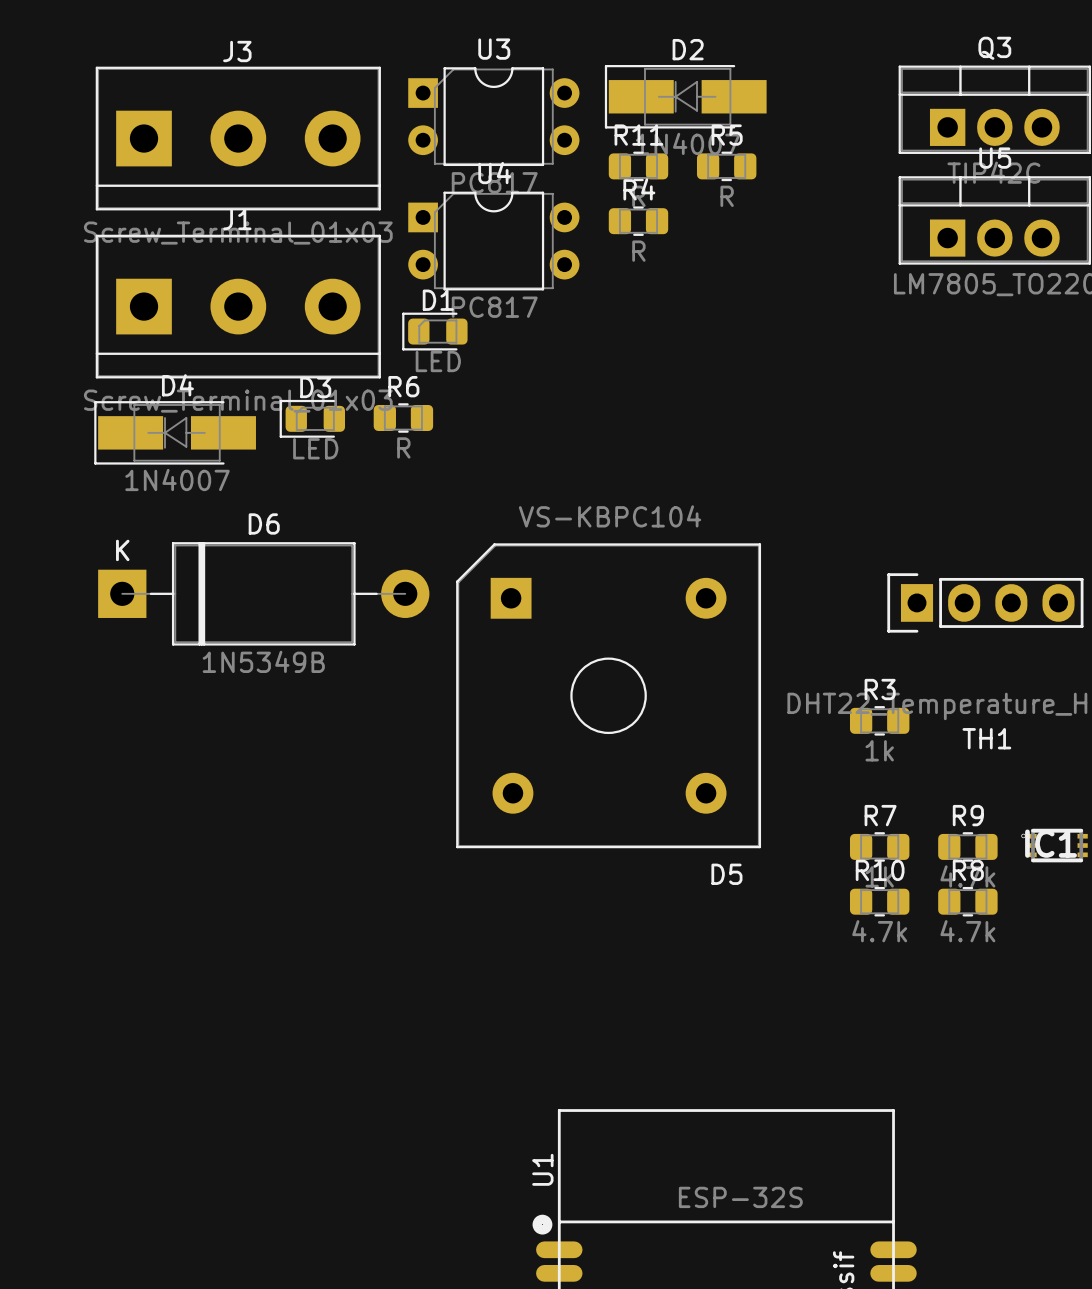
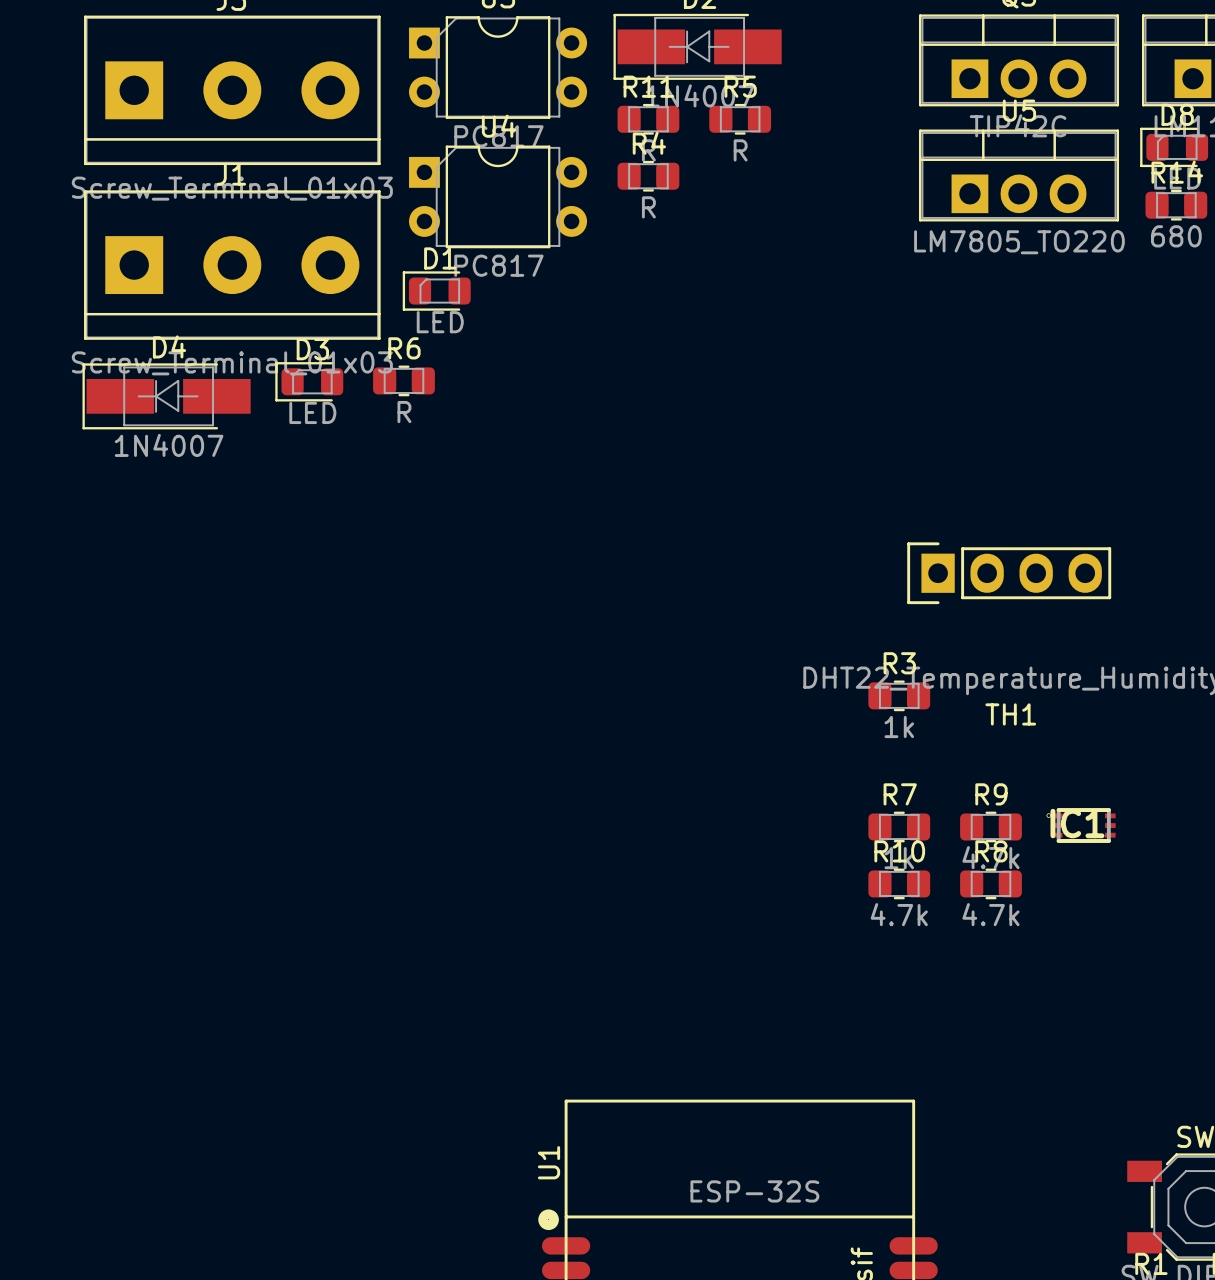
D6: 1N5349B (263, 593) -> none
D5: VS-KBPC104 (608, 695) -> none

